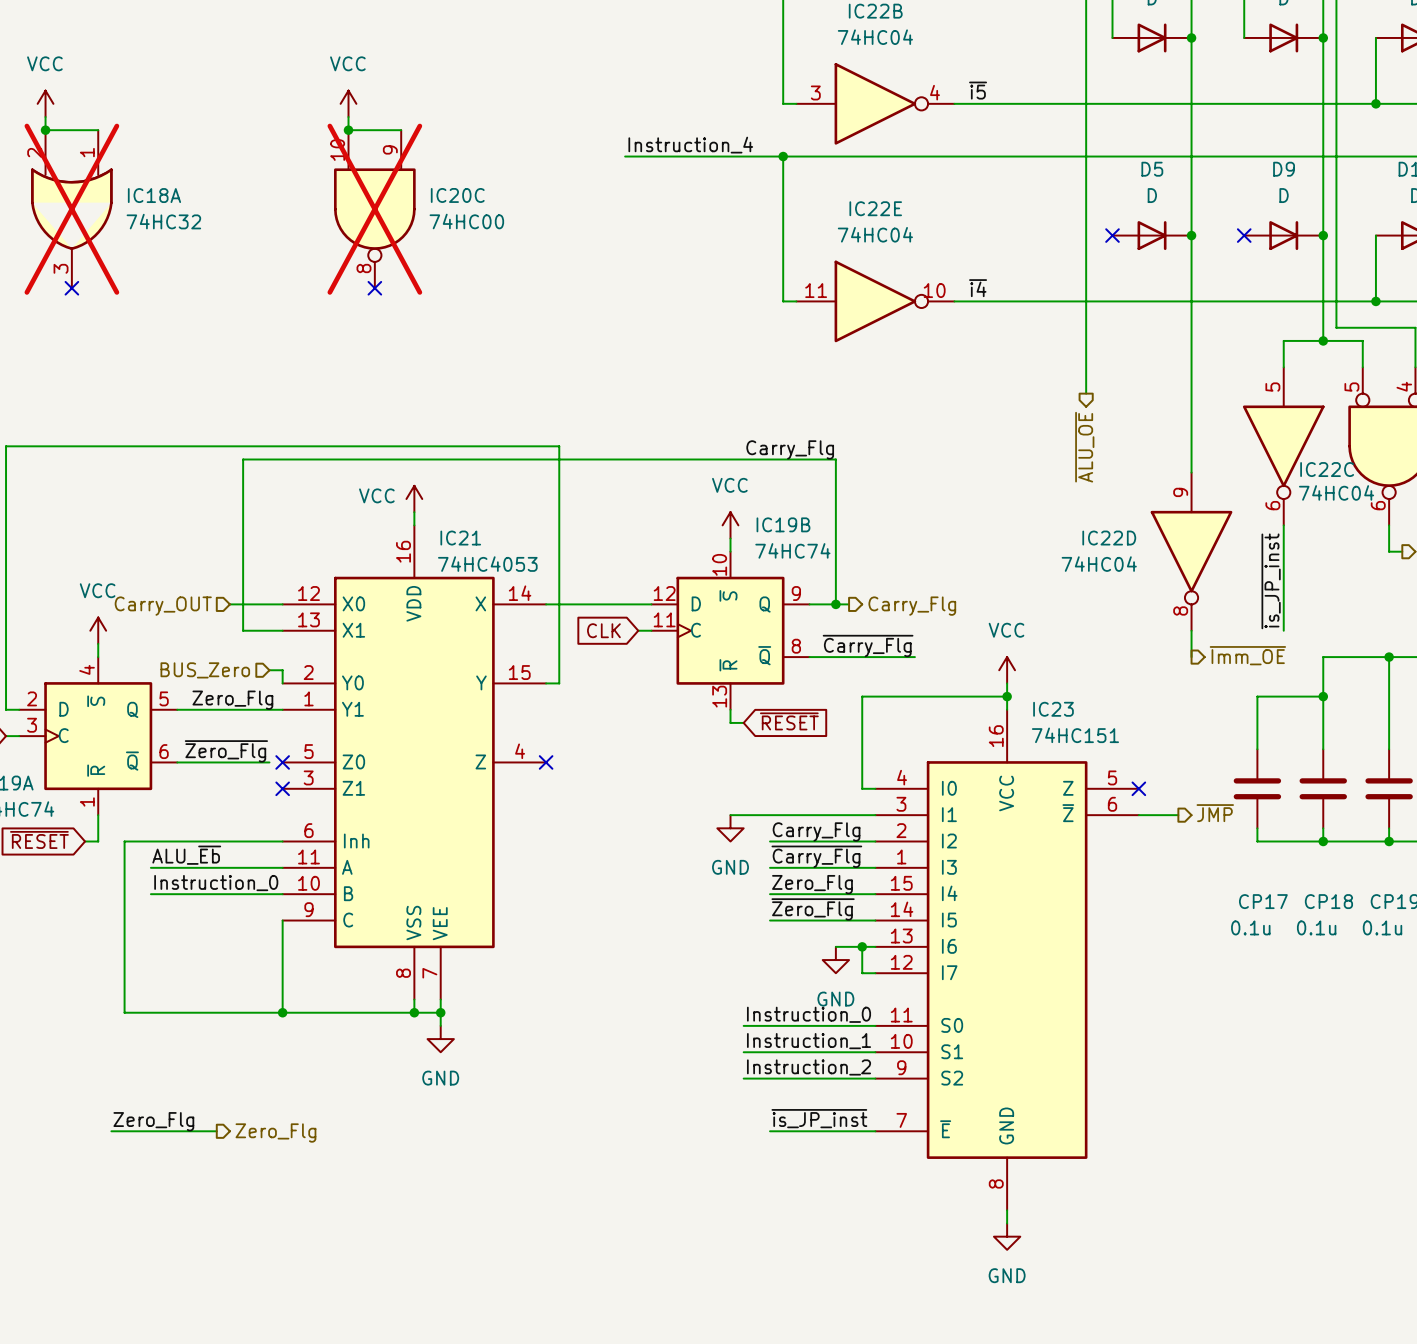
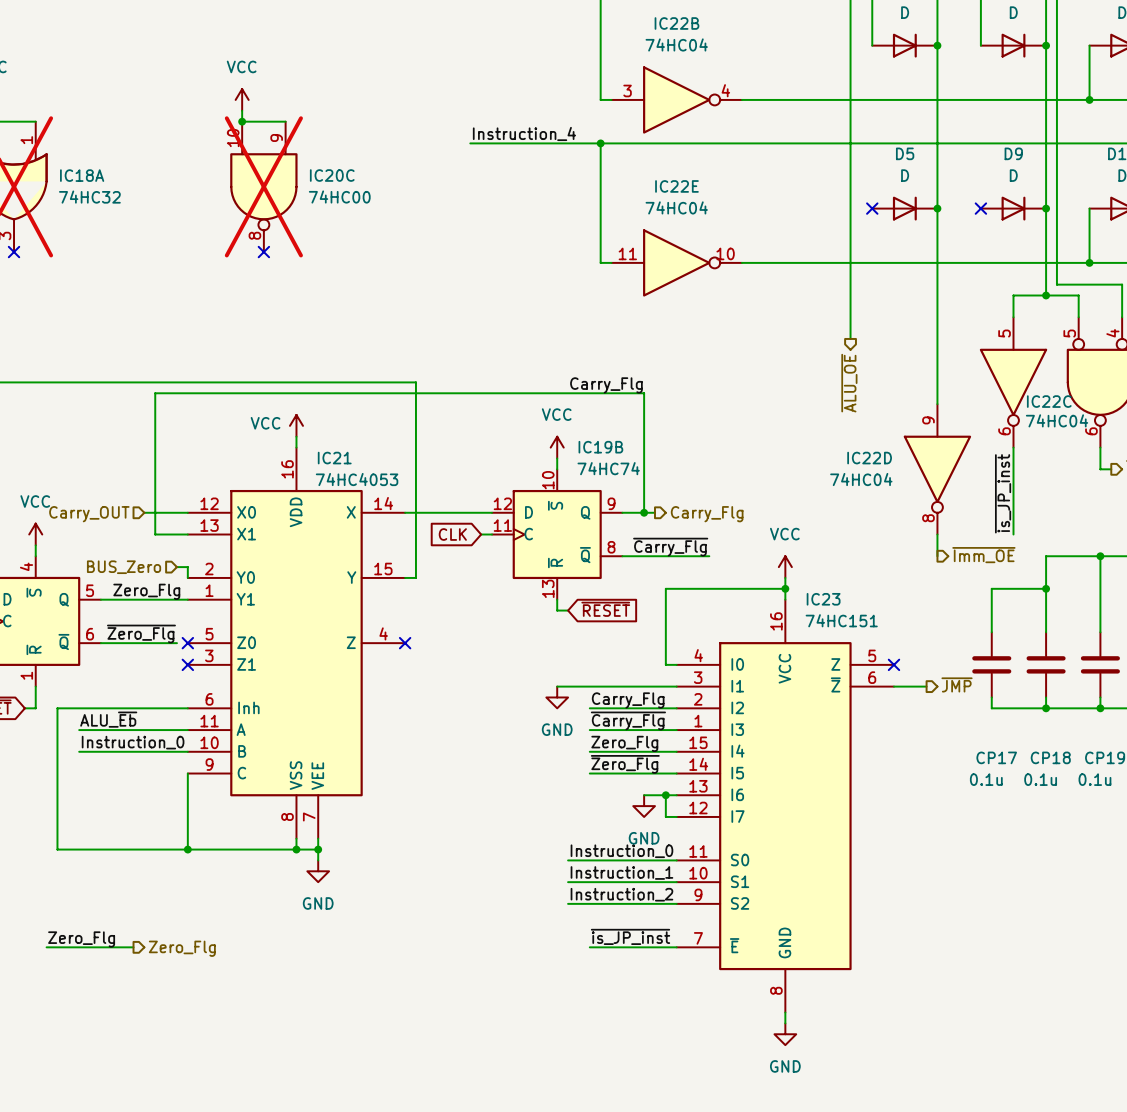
label: ~{i5} (978, 90) -> none
label: ~{i4} (978, 288) -> none

